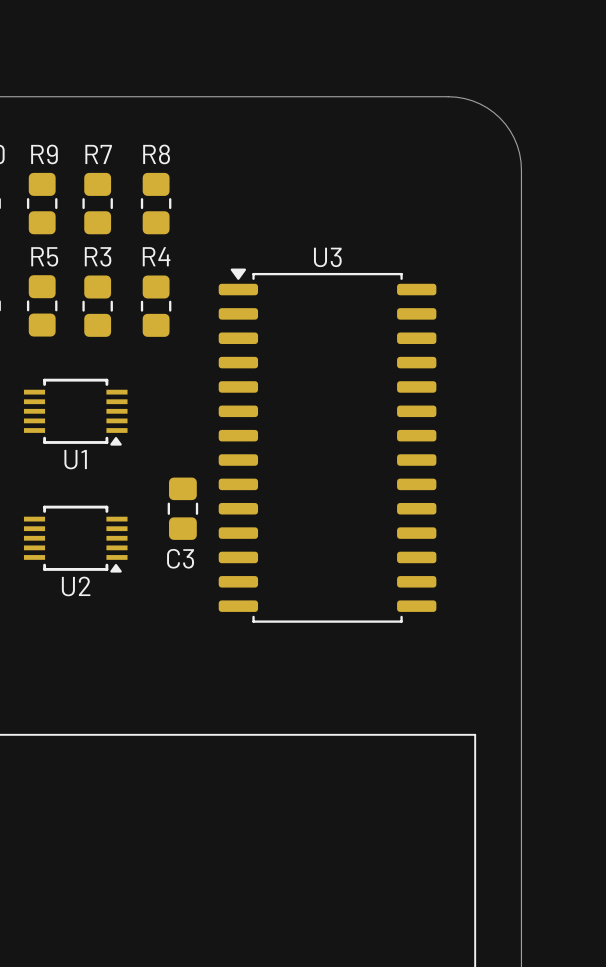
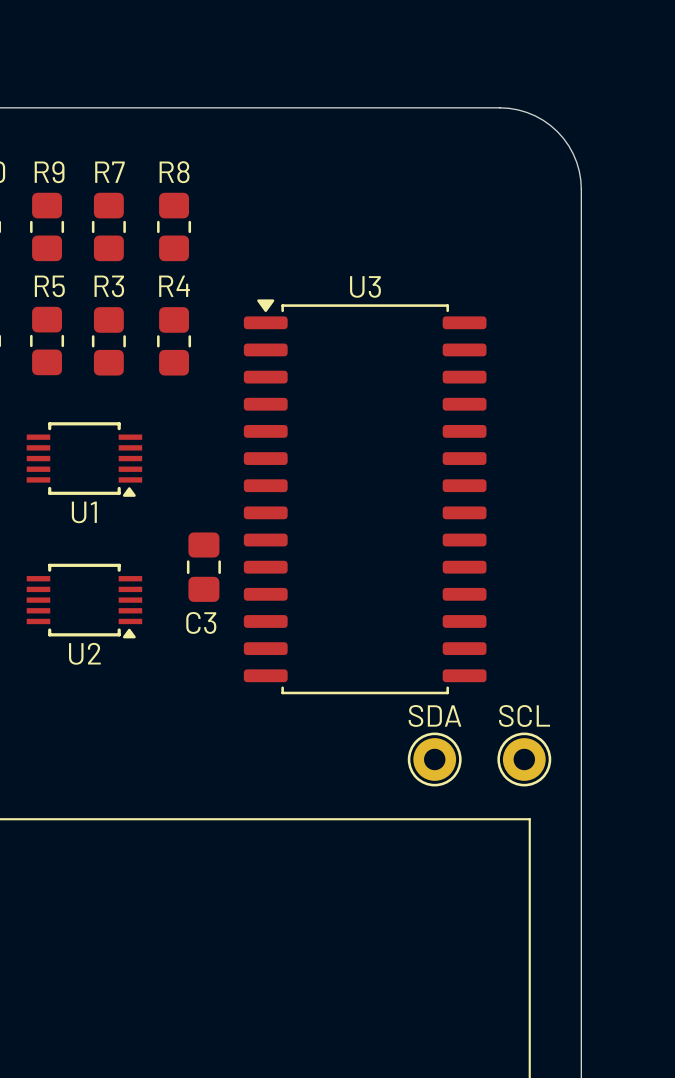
SDA: none -> (434, 759)
SCL: none -> (524, 759)

